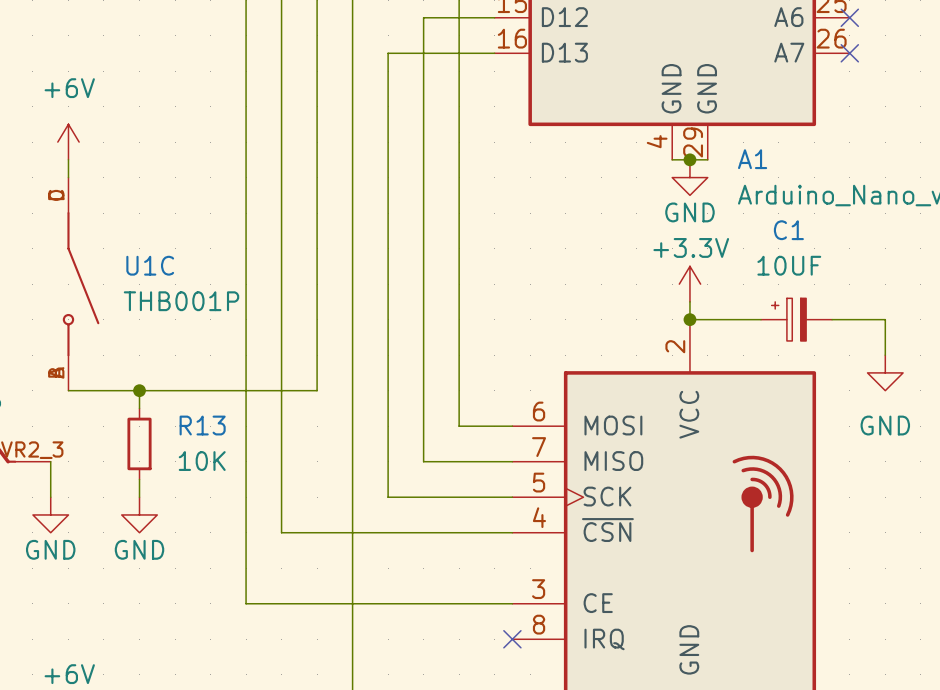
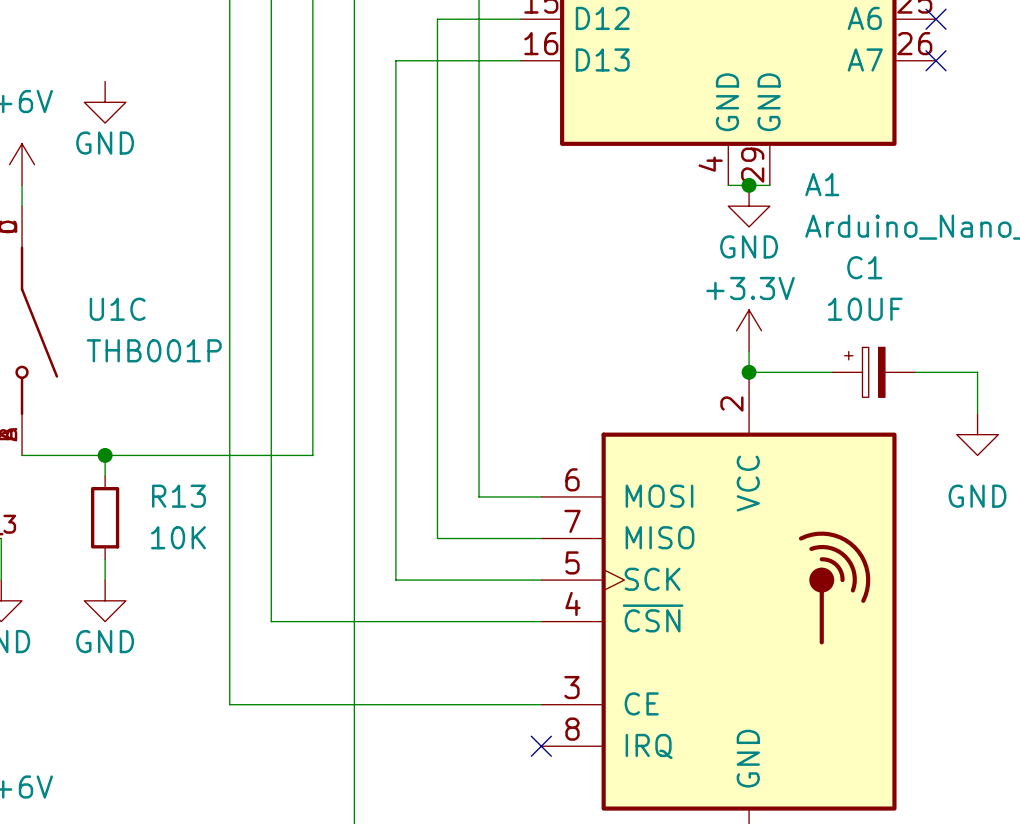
power symbol: none -> GND (105, 102)

